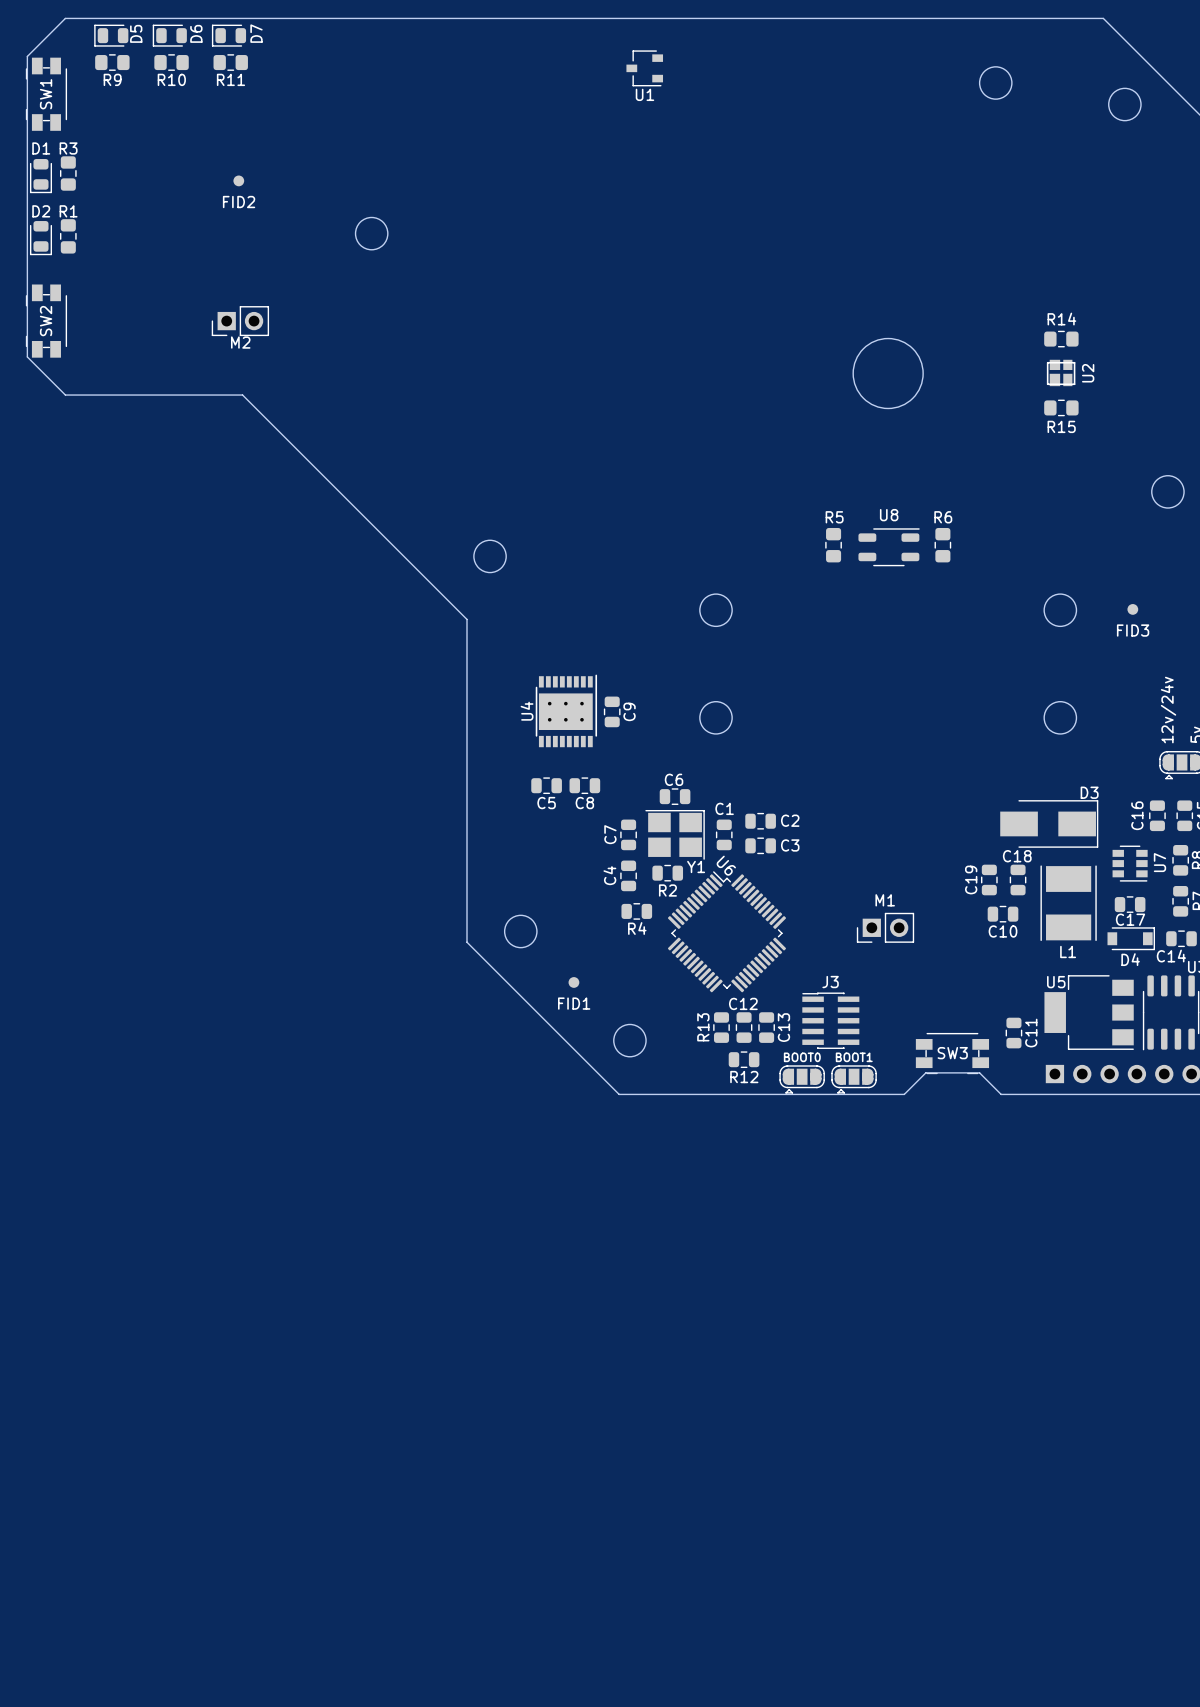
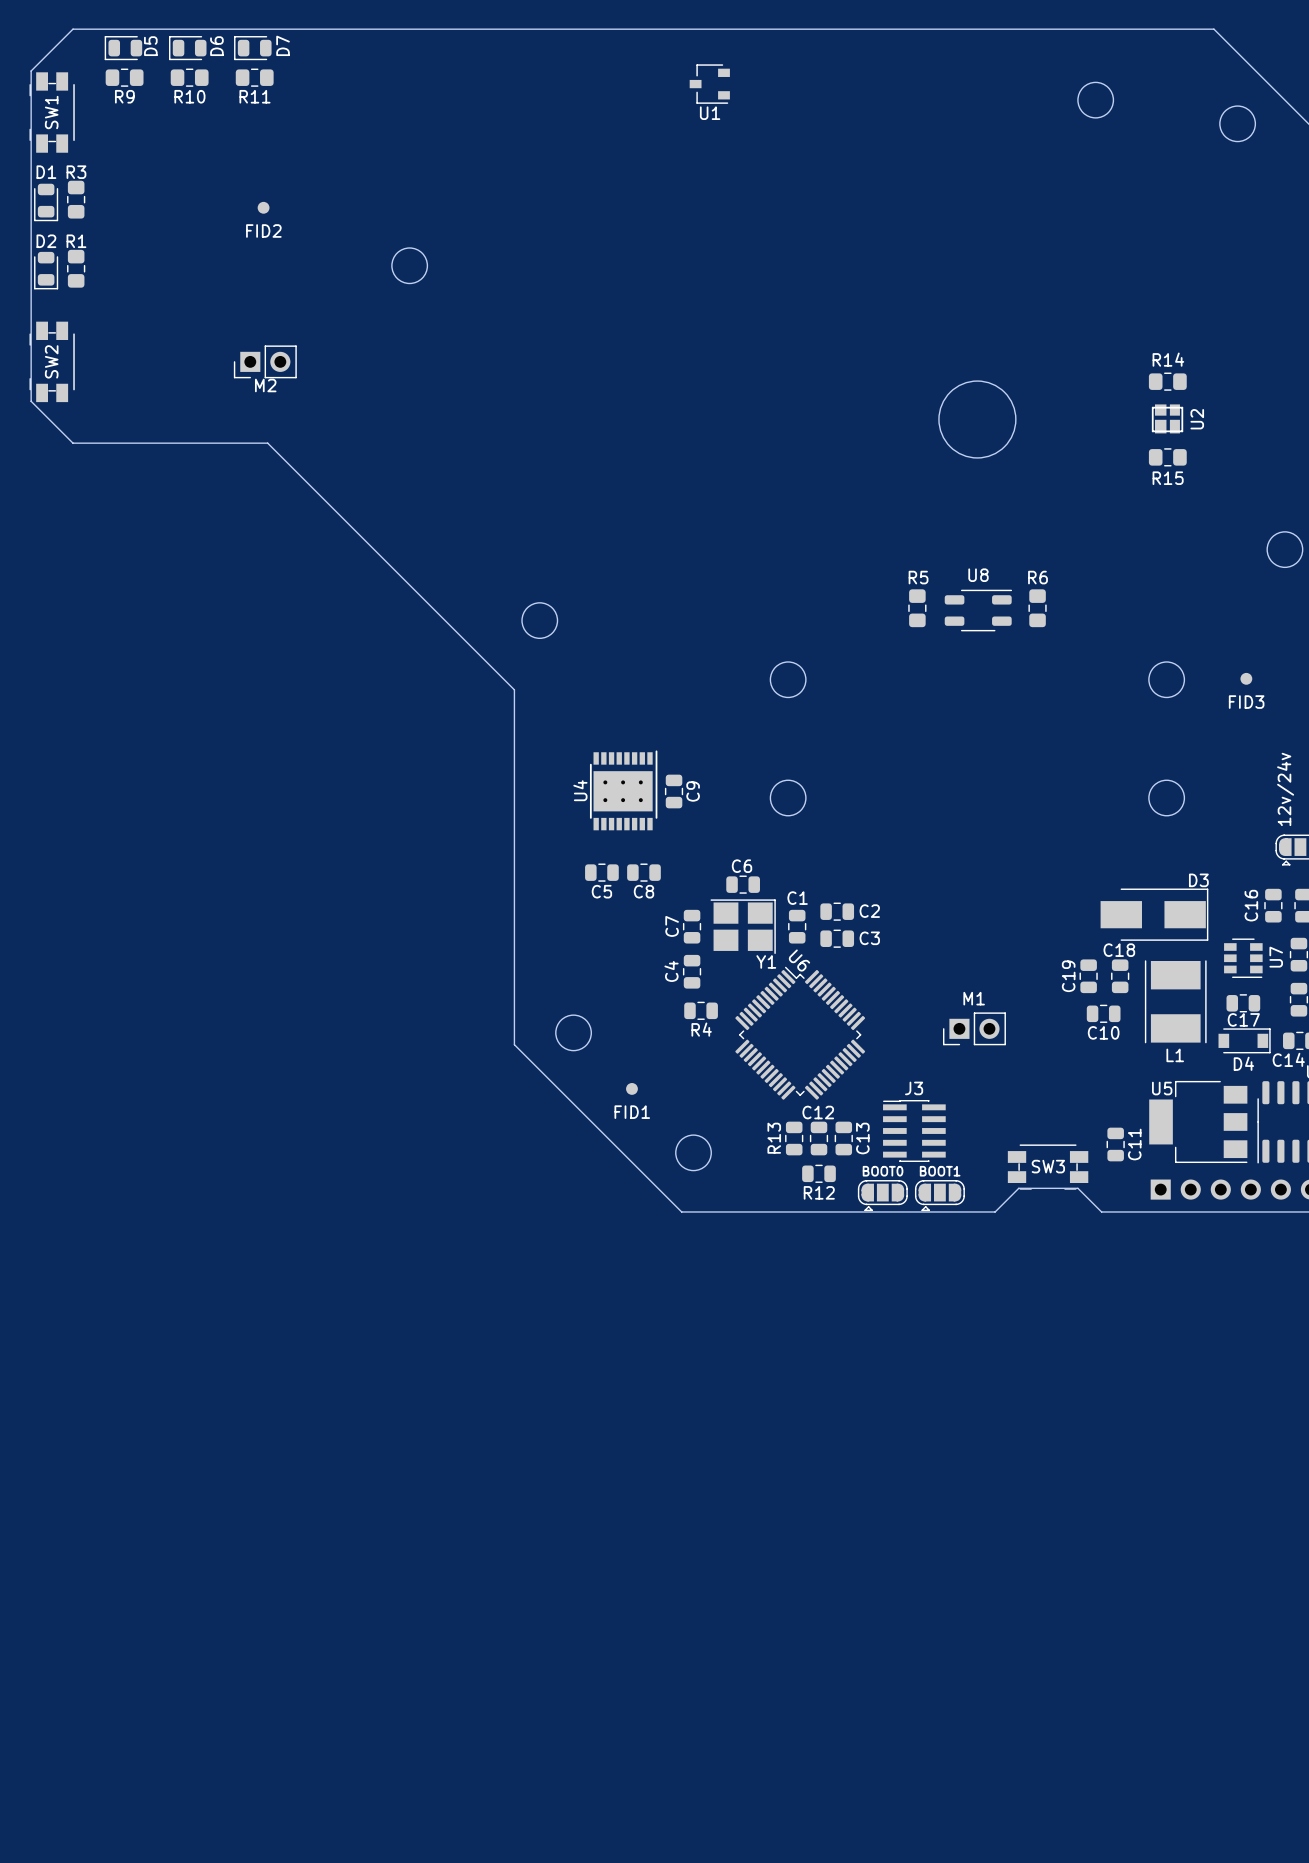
R2: (667, 873) -> none

